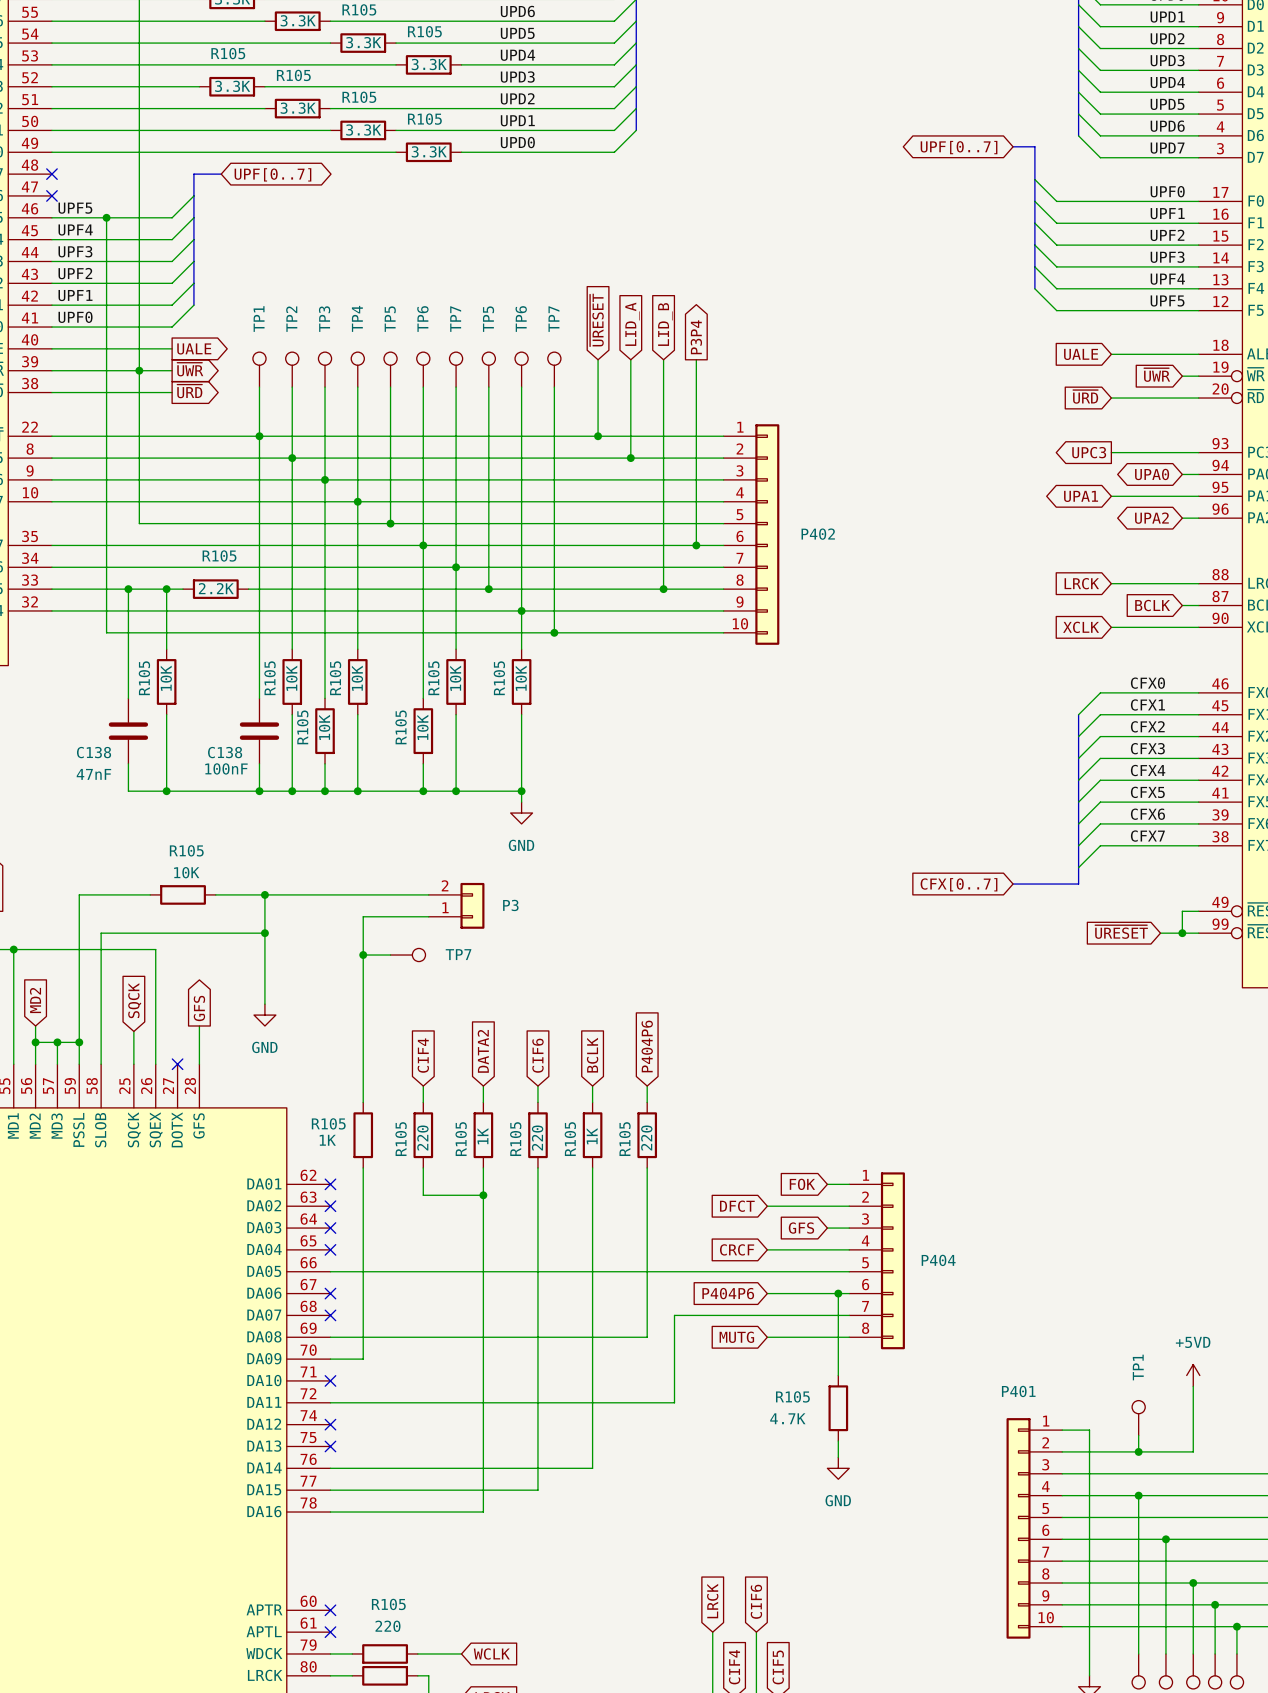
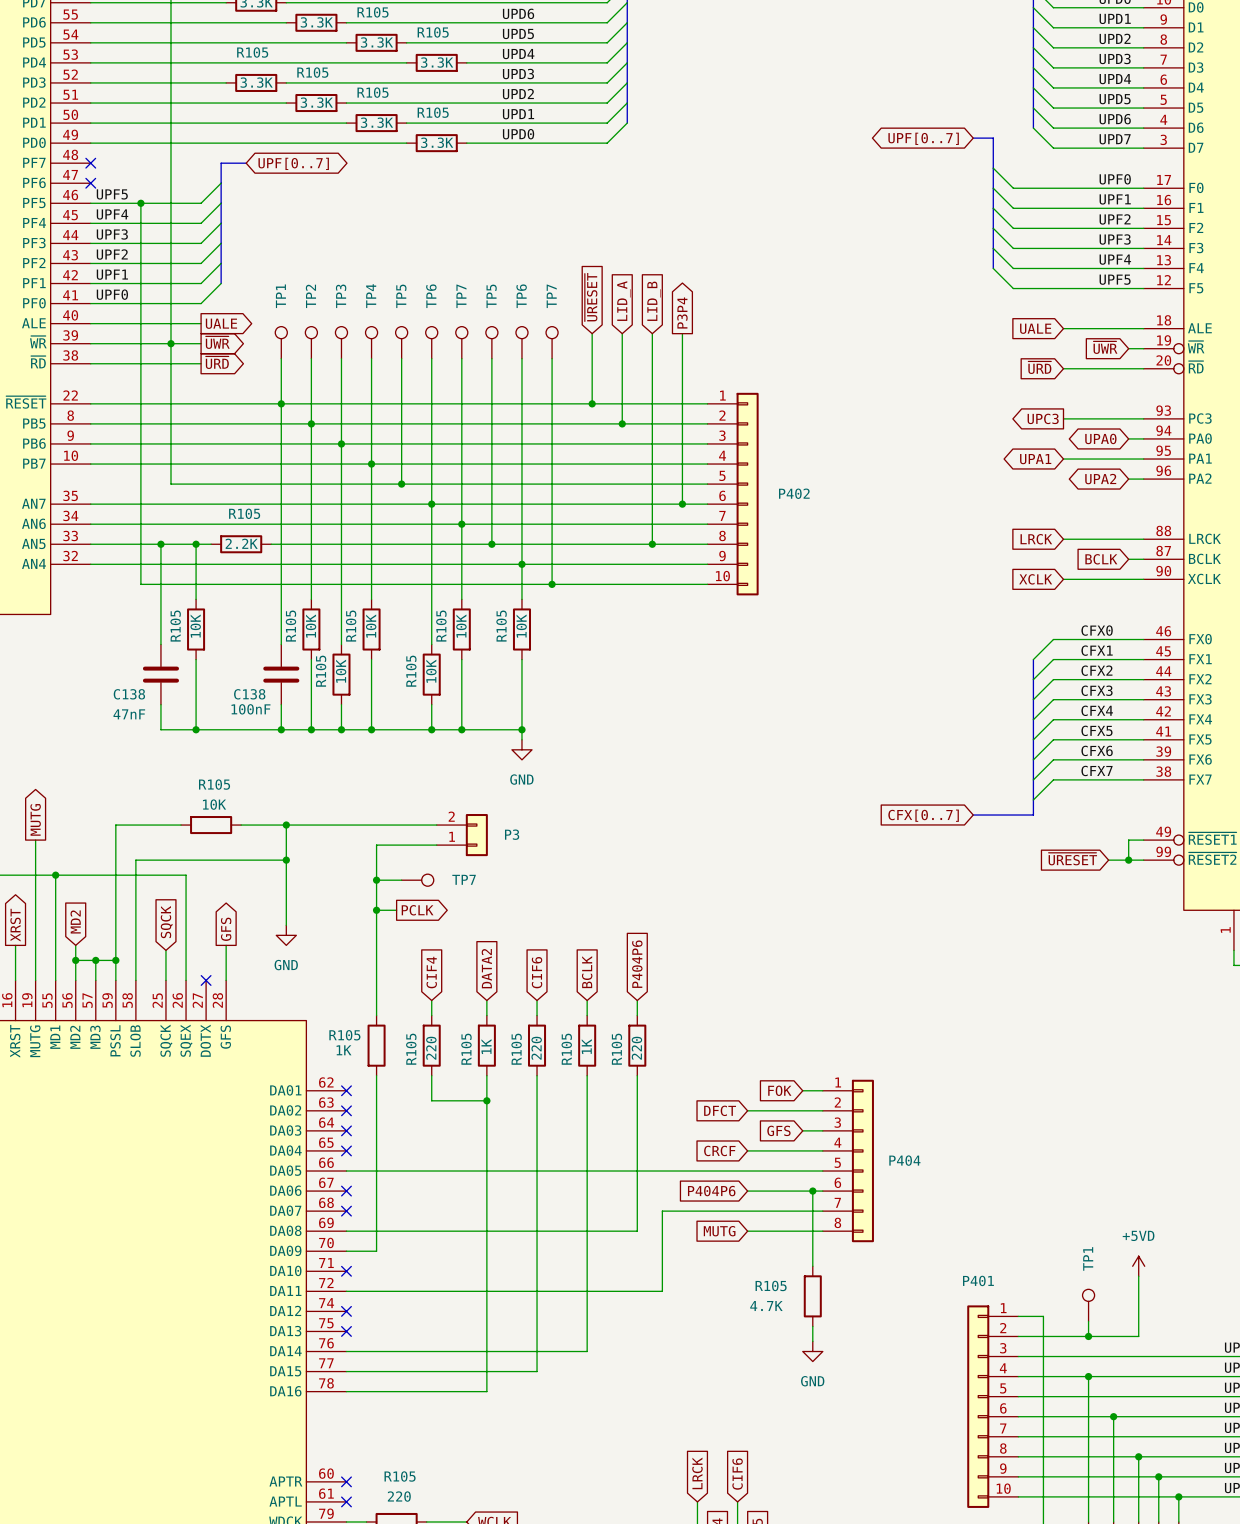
wire: none -> (376, 910) (396, 910)
junction: none -> (376, 910)
global label: none -> PCLK (417, 910)

